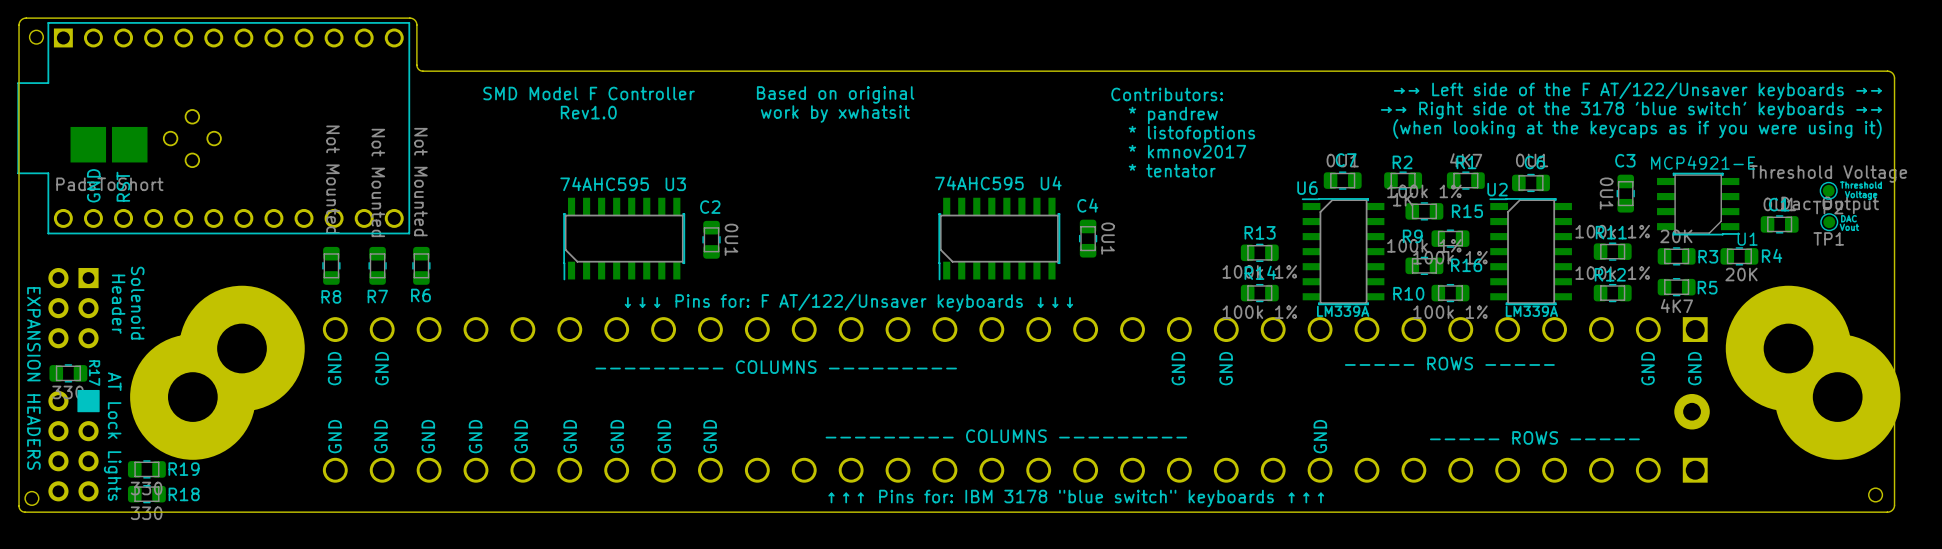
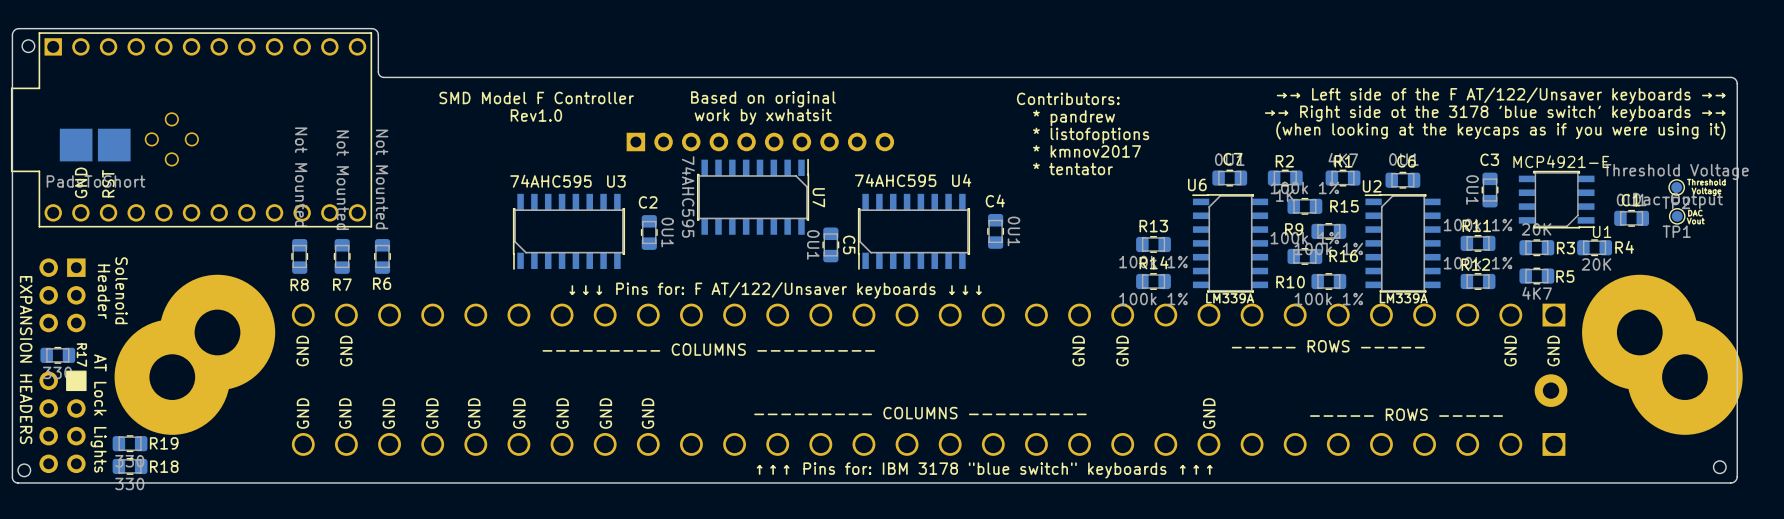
part: none -> (760, 142)
U7: none -> 74AHC595 (753, 196)
C5: none -> 0U1 (830, 244)

